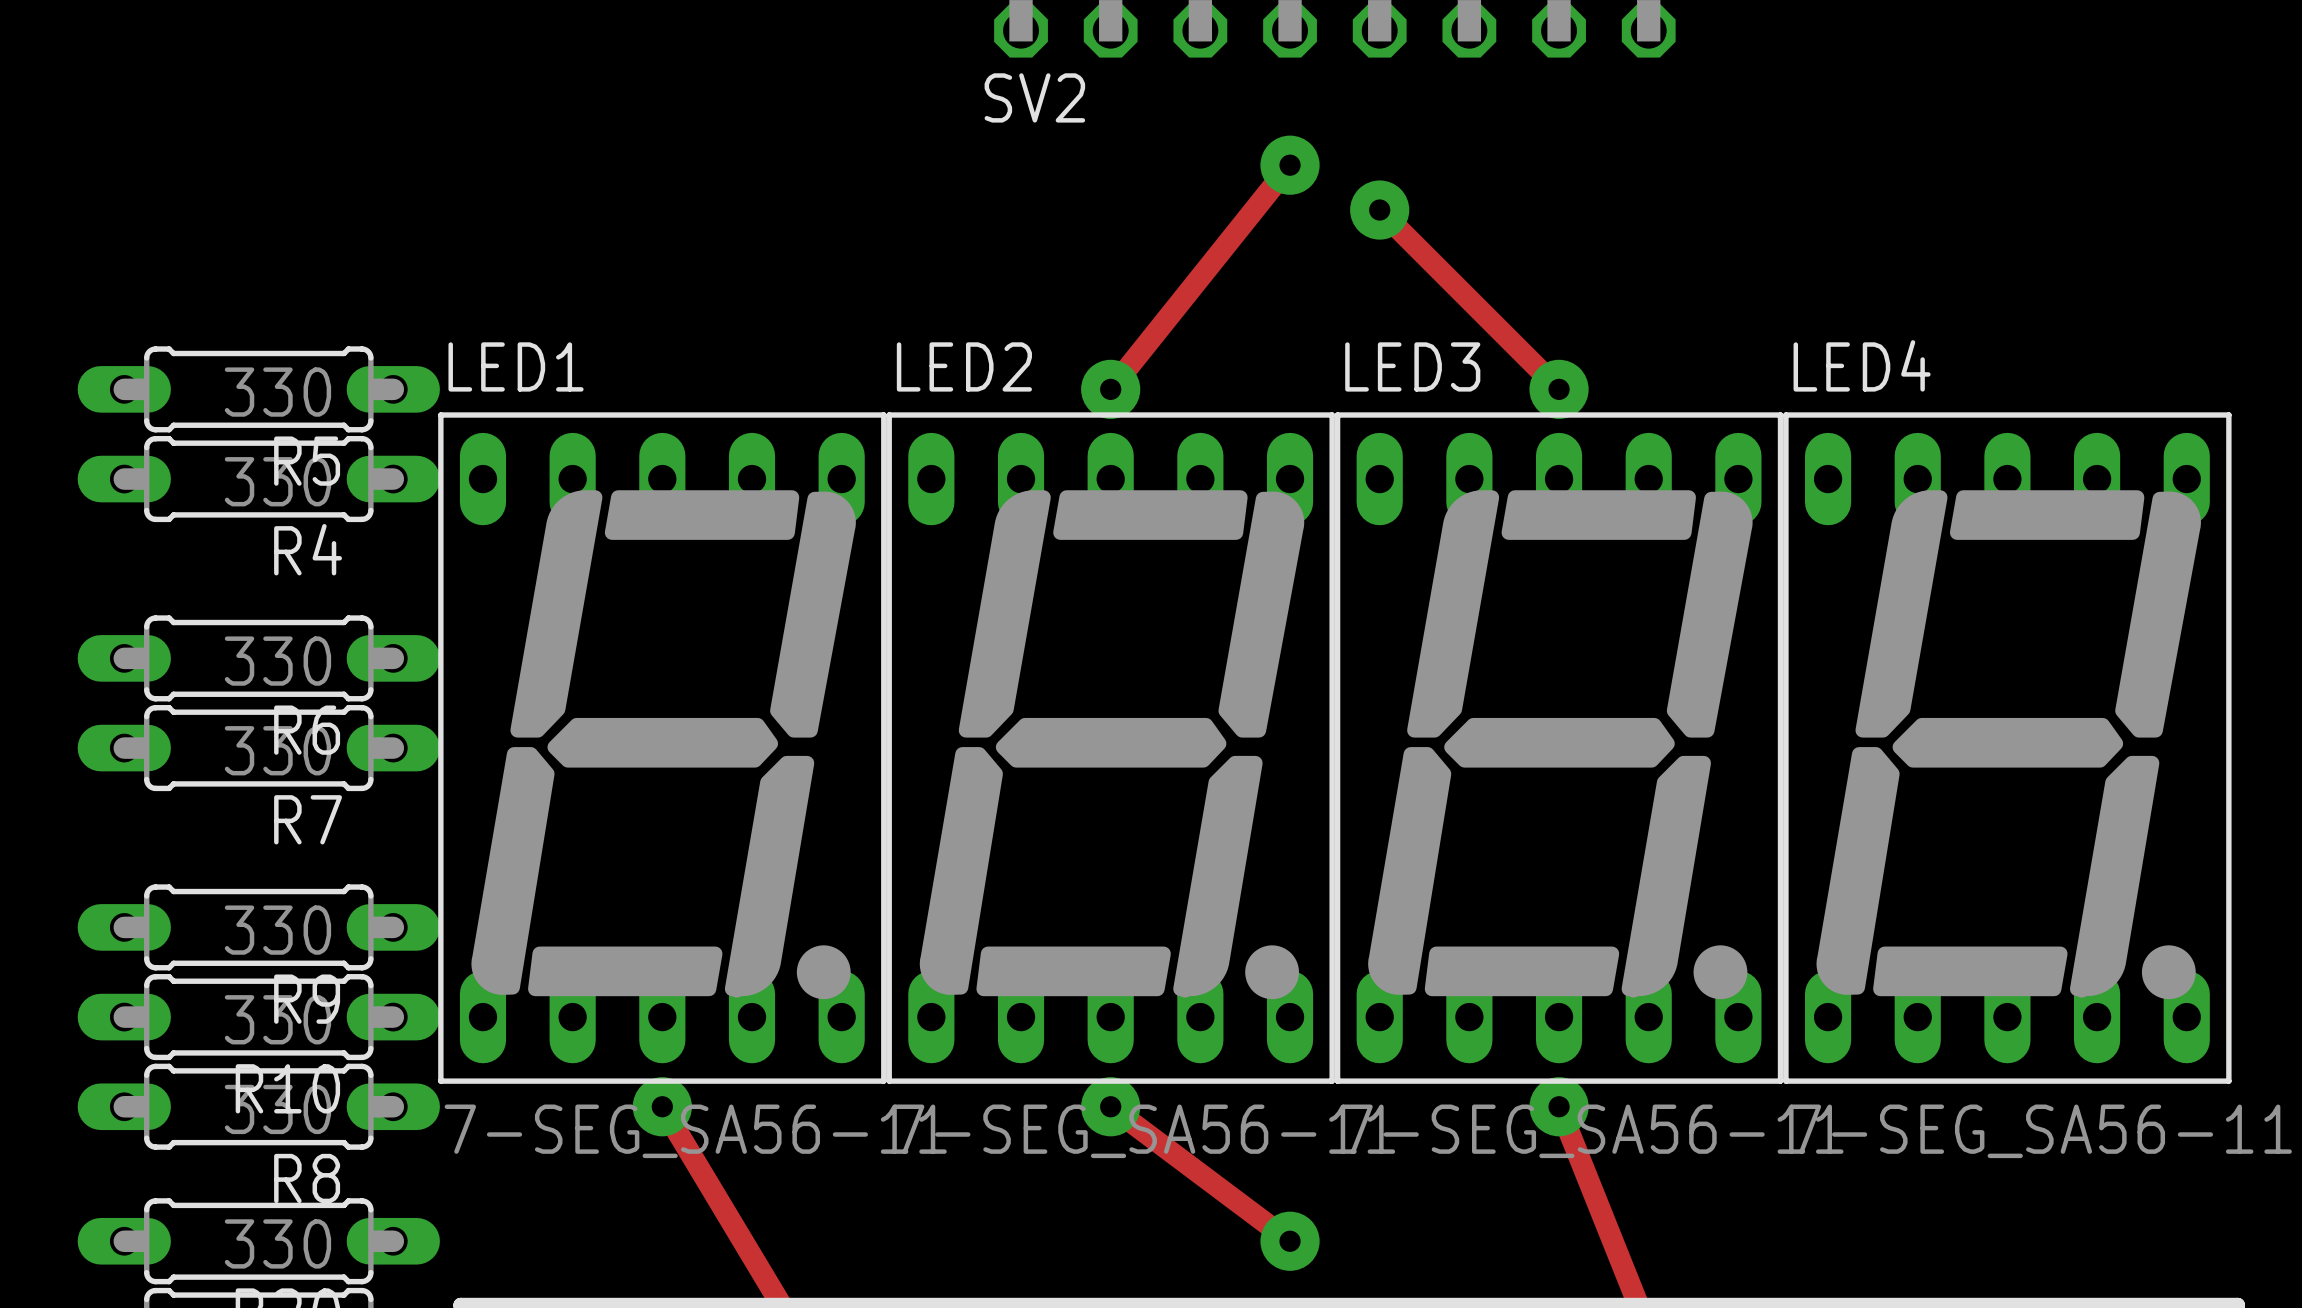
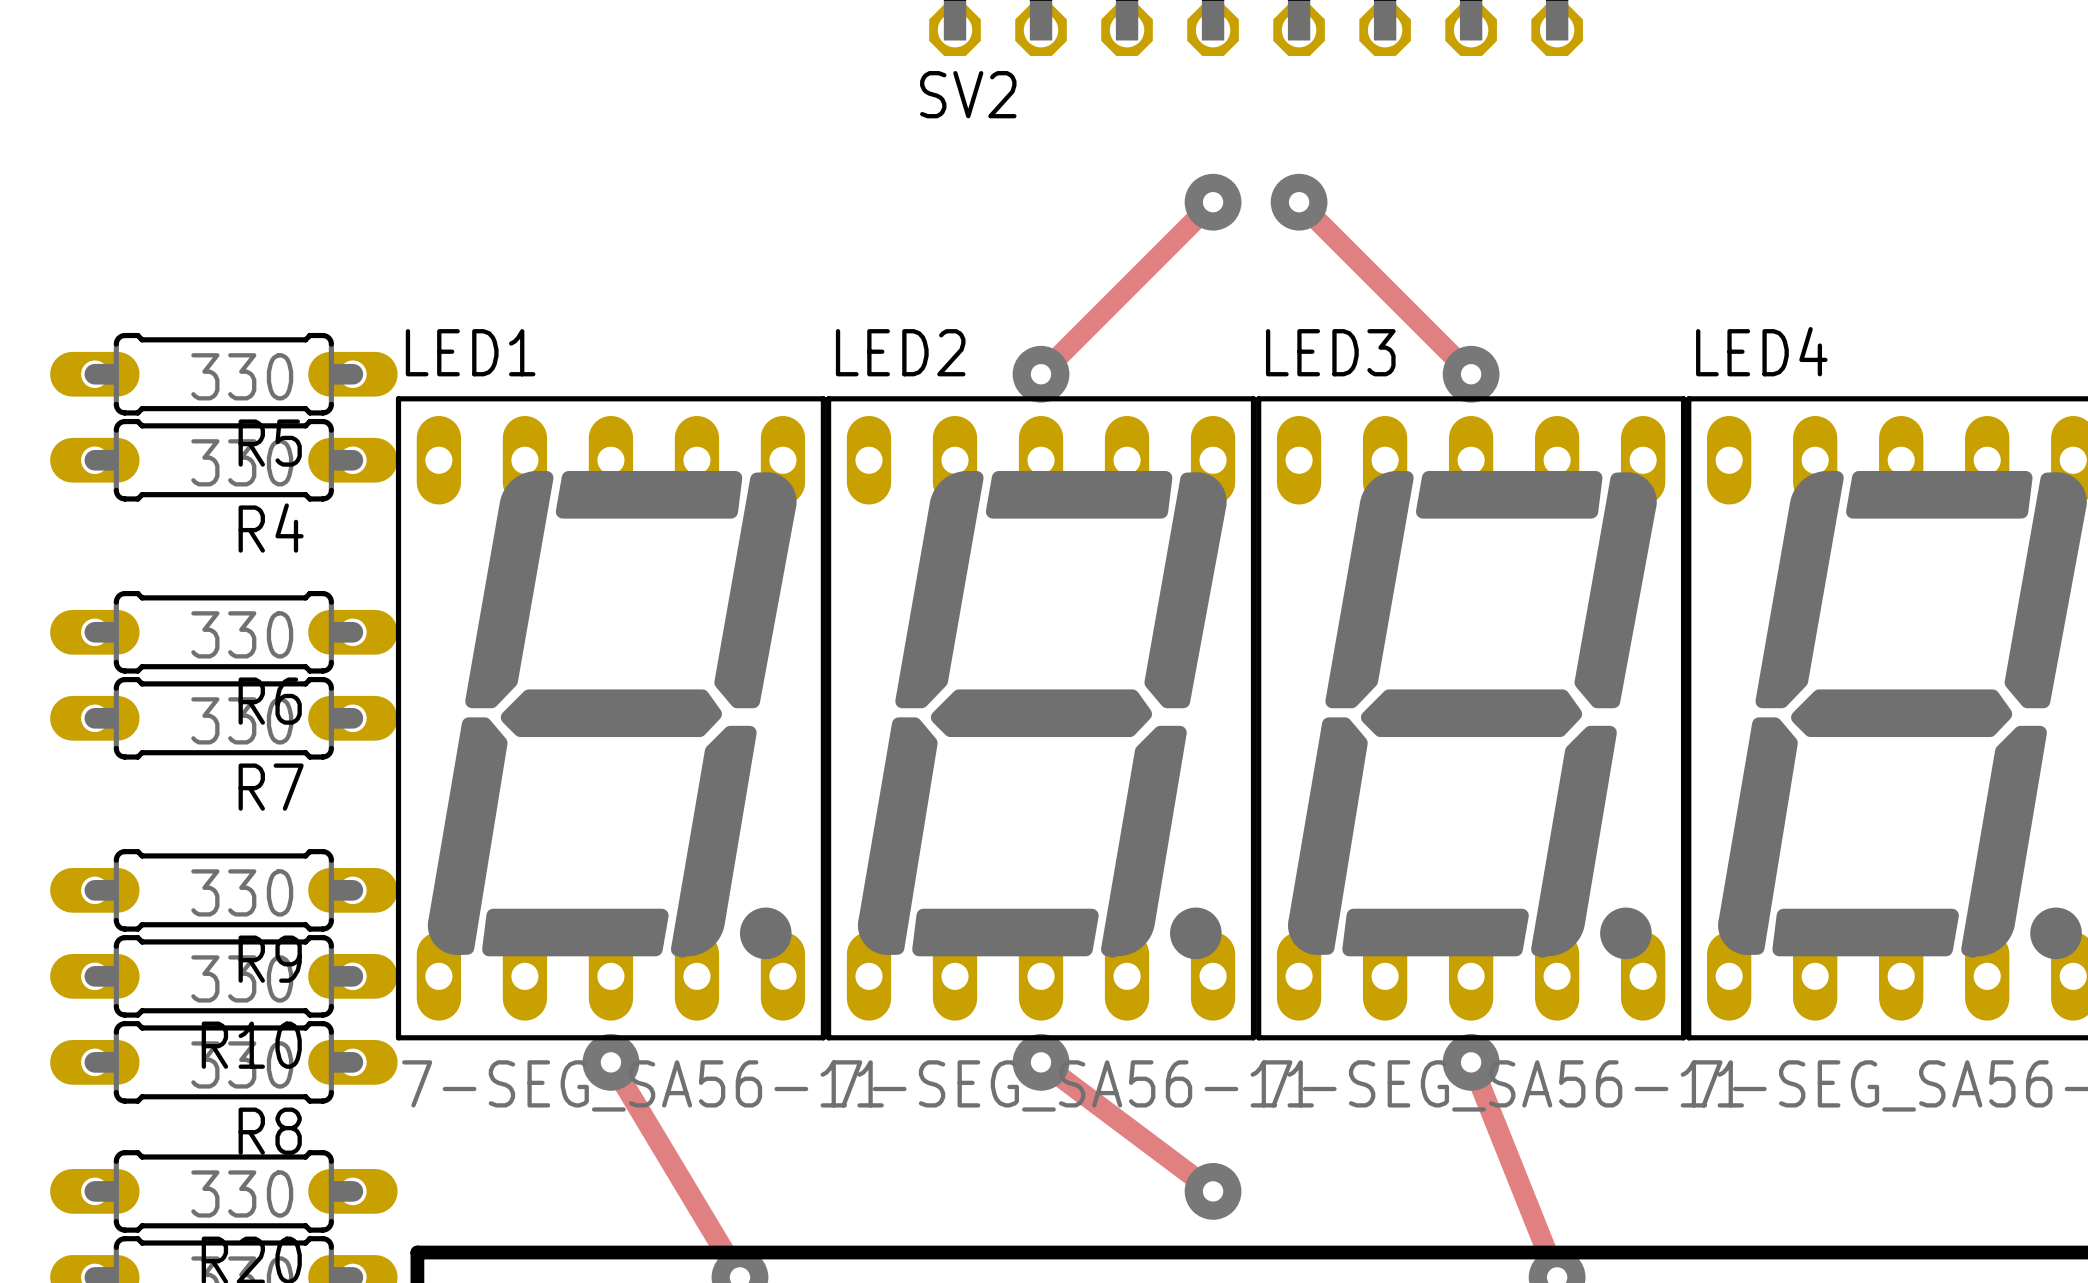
track: (1290, 165) (1110, 389) -> (1213, 202) (1041, 374)
via position: (1290, 165) -> (1213, 202)

